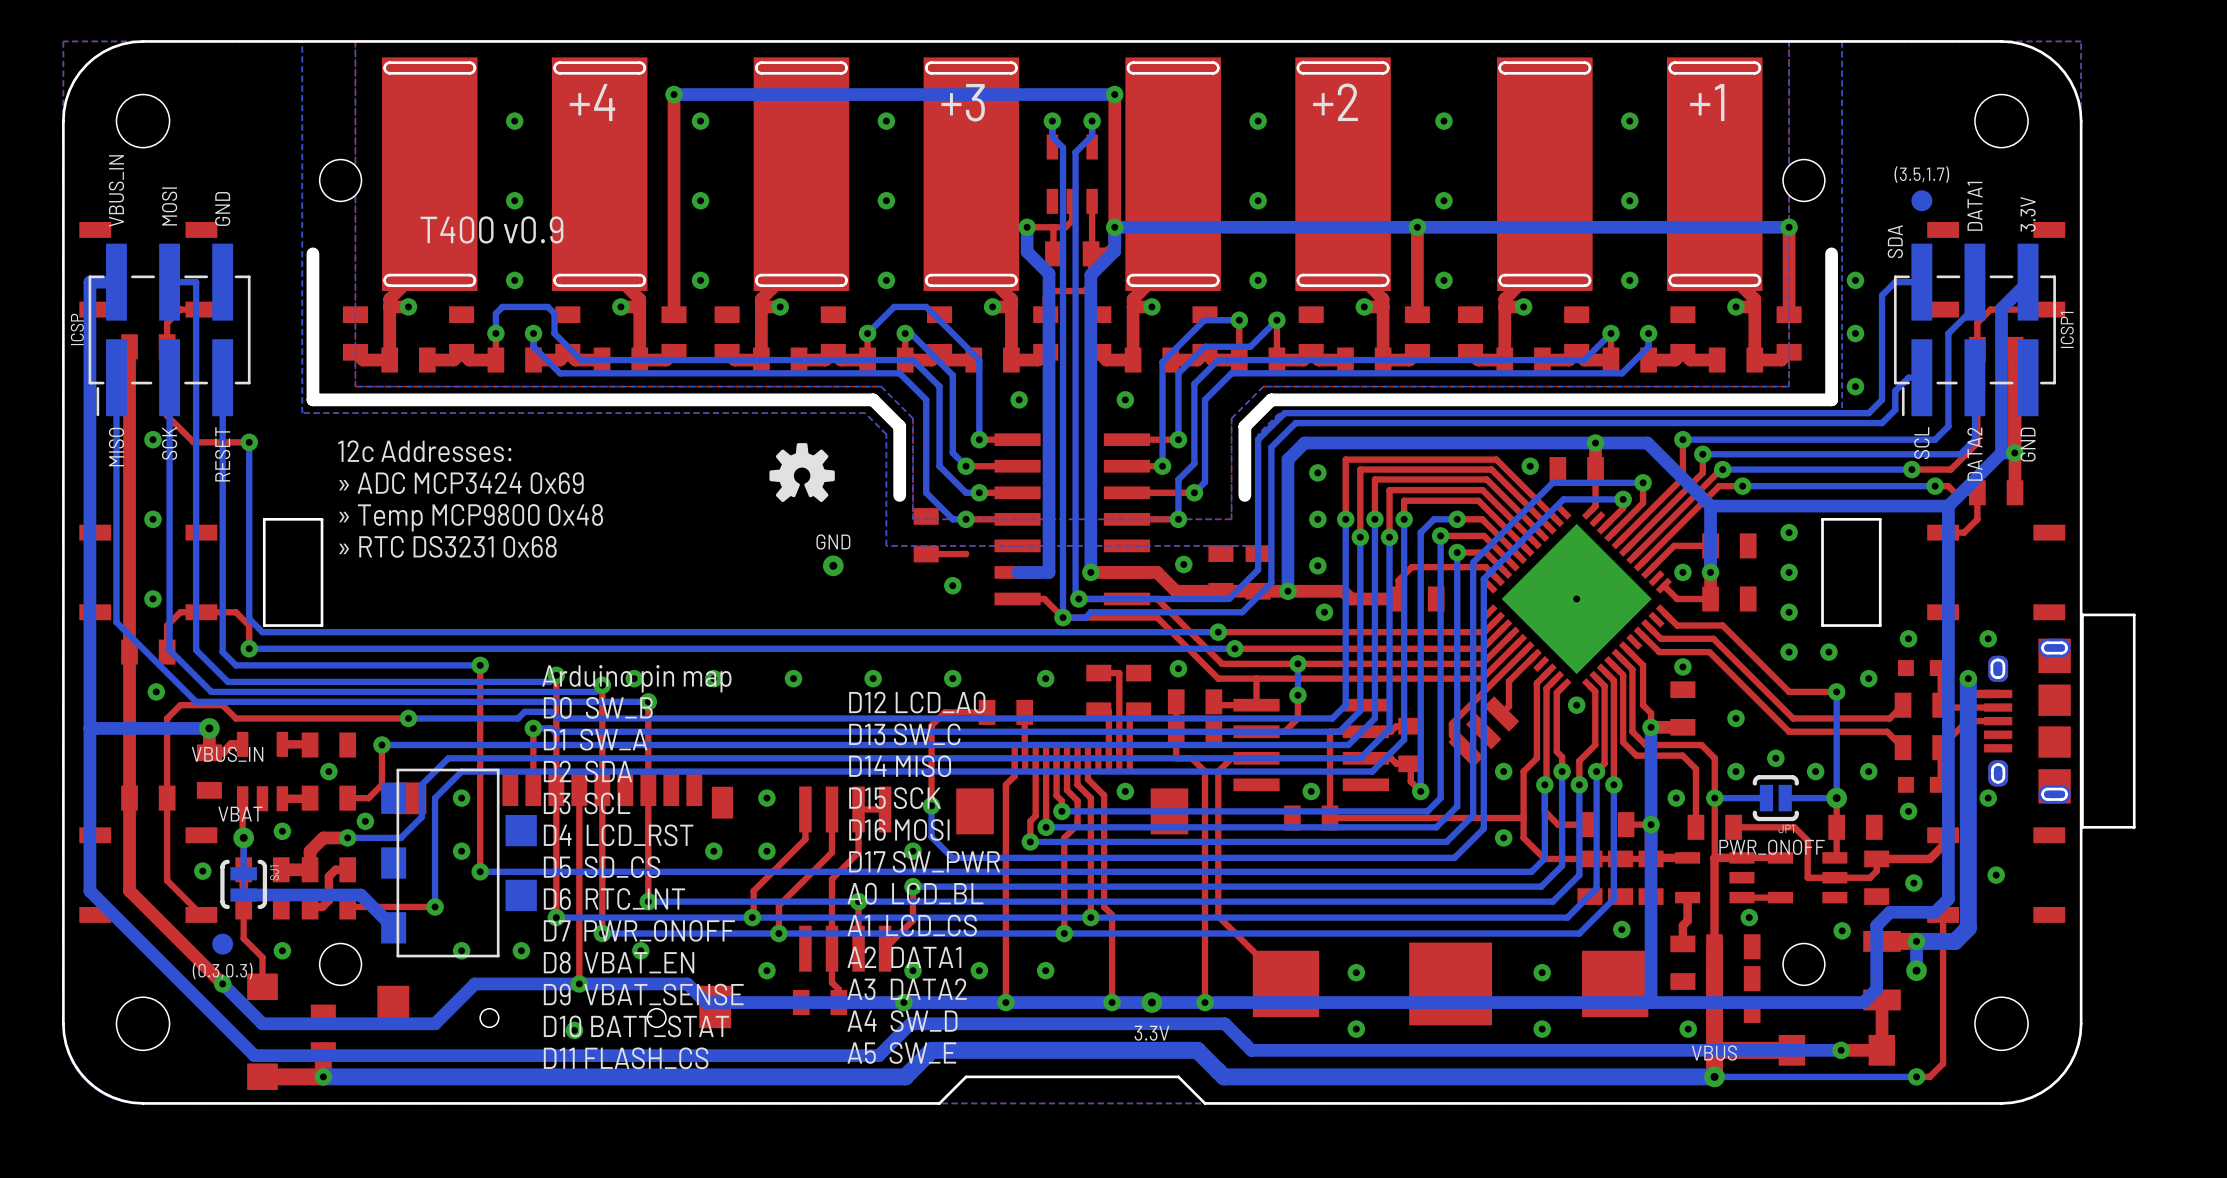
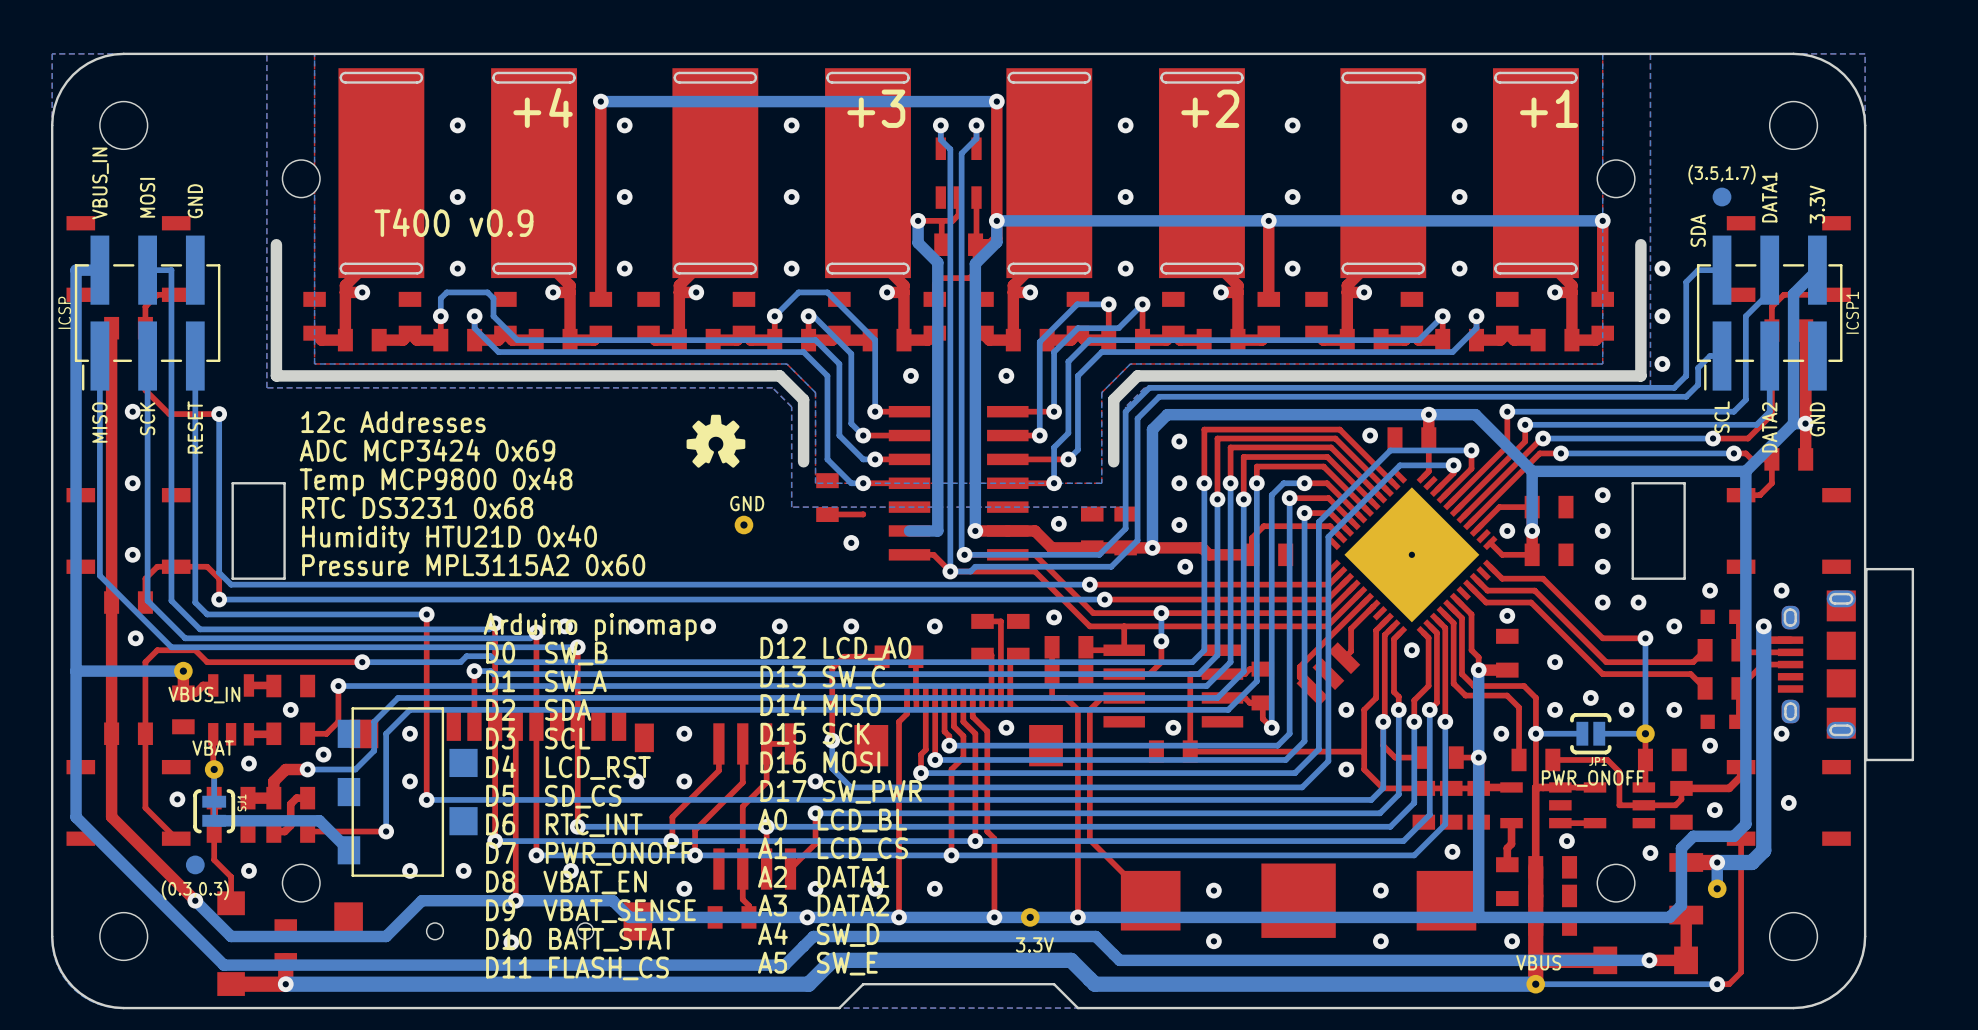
text: 12c Addresses: (424, 451) -> 12c Addresses (393, 422)
text: » ADC MCP3424 0x69 (461, 483) -> ADC MCP3424 0x69 (427, 450)
text: » Temp MCP9800 0x48 (471, 517) -> Temp MCP9800 0x48 (436, 482)
text: » RTC DS3231 0x68 (447, 546) -> RTC DS3231 0x68 (417, 507)
text: none -> Humidity HTU21D 0x40 (449, 539)
text: none -> Pressure MPL3115A2 0x60 (473, 565)

